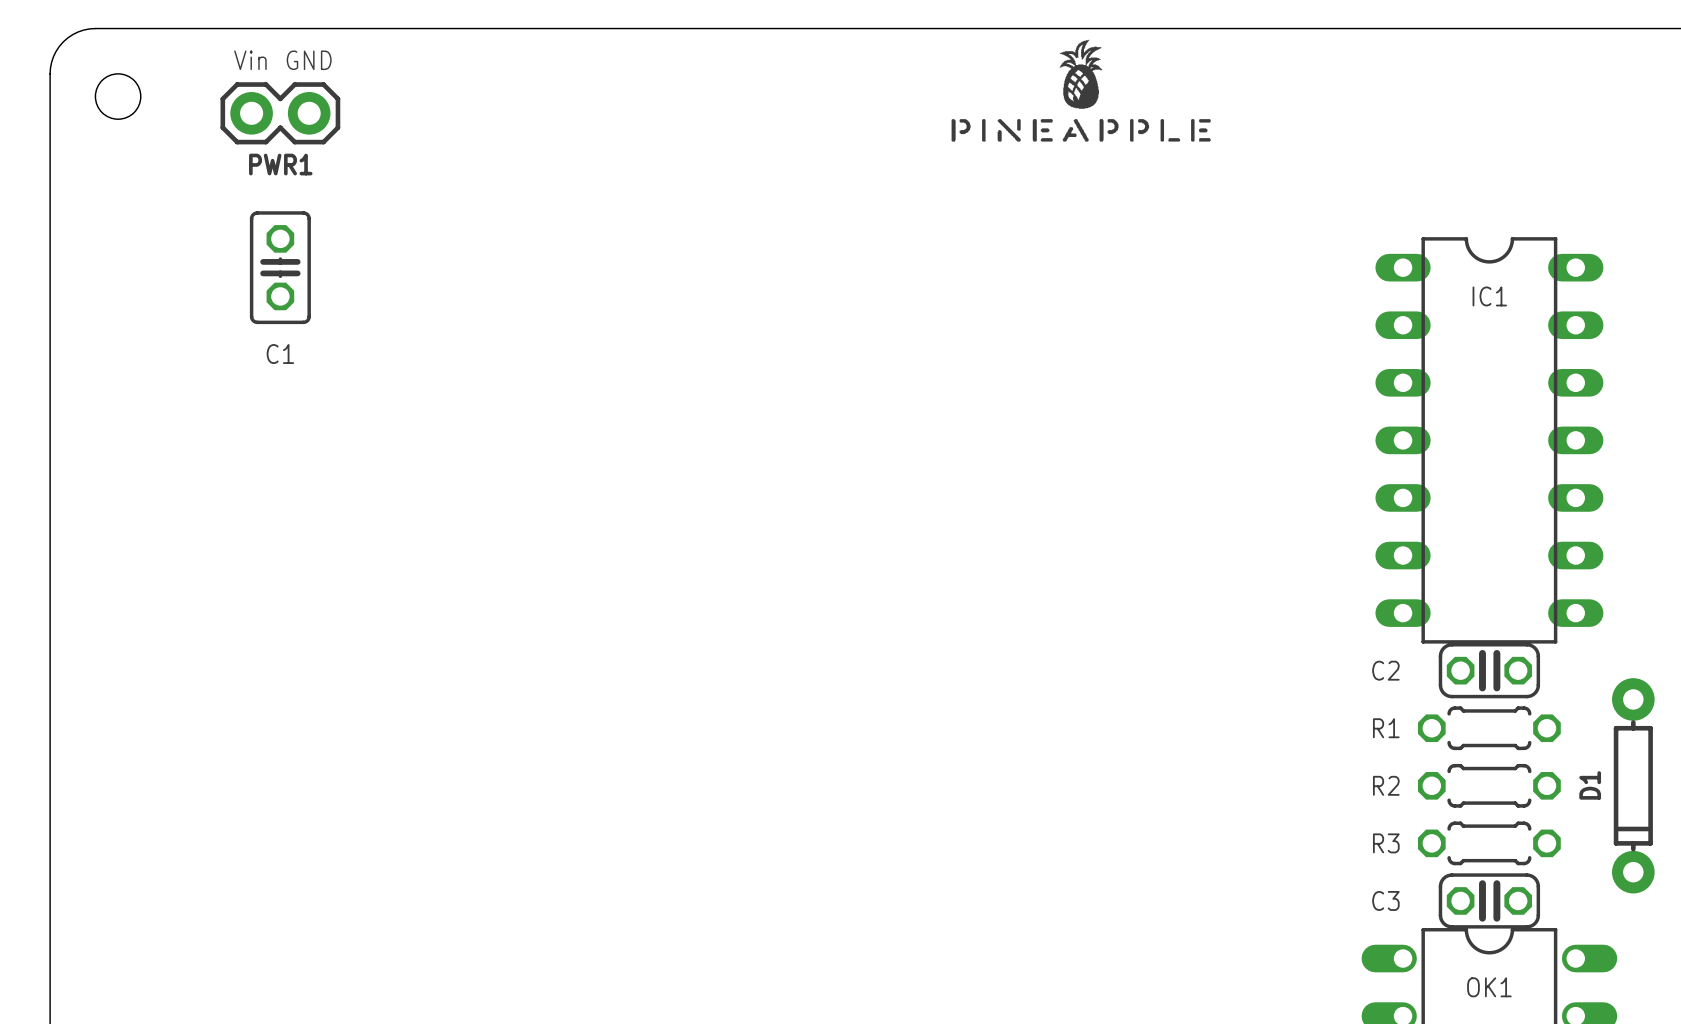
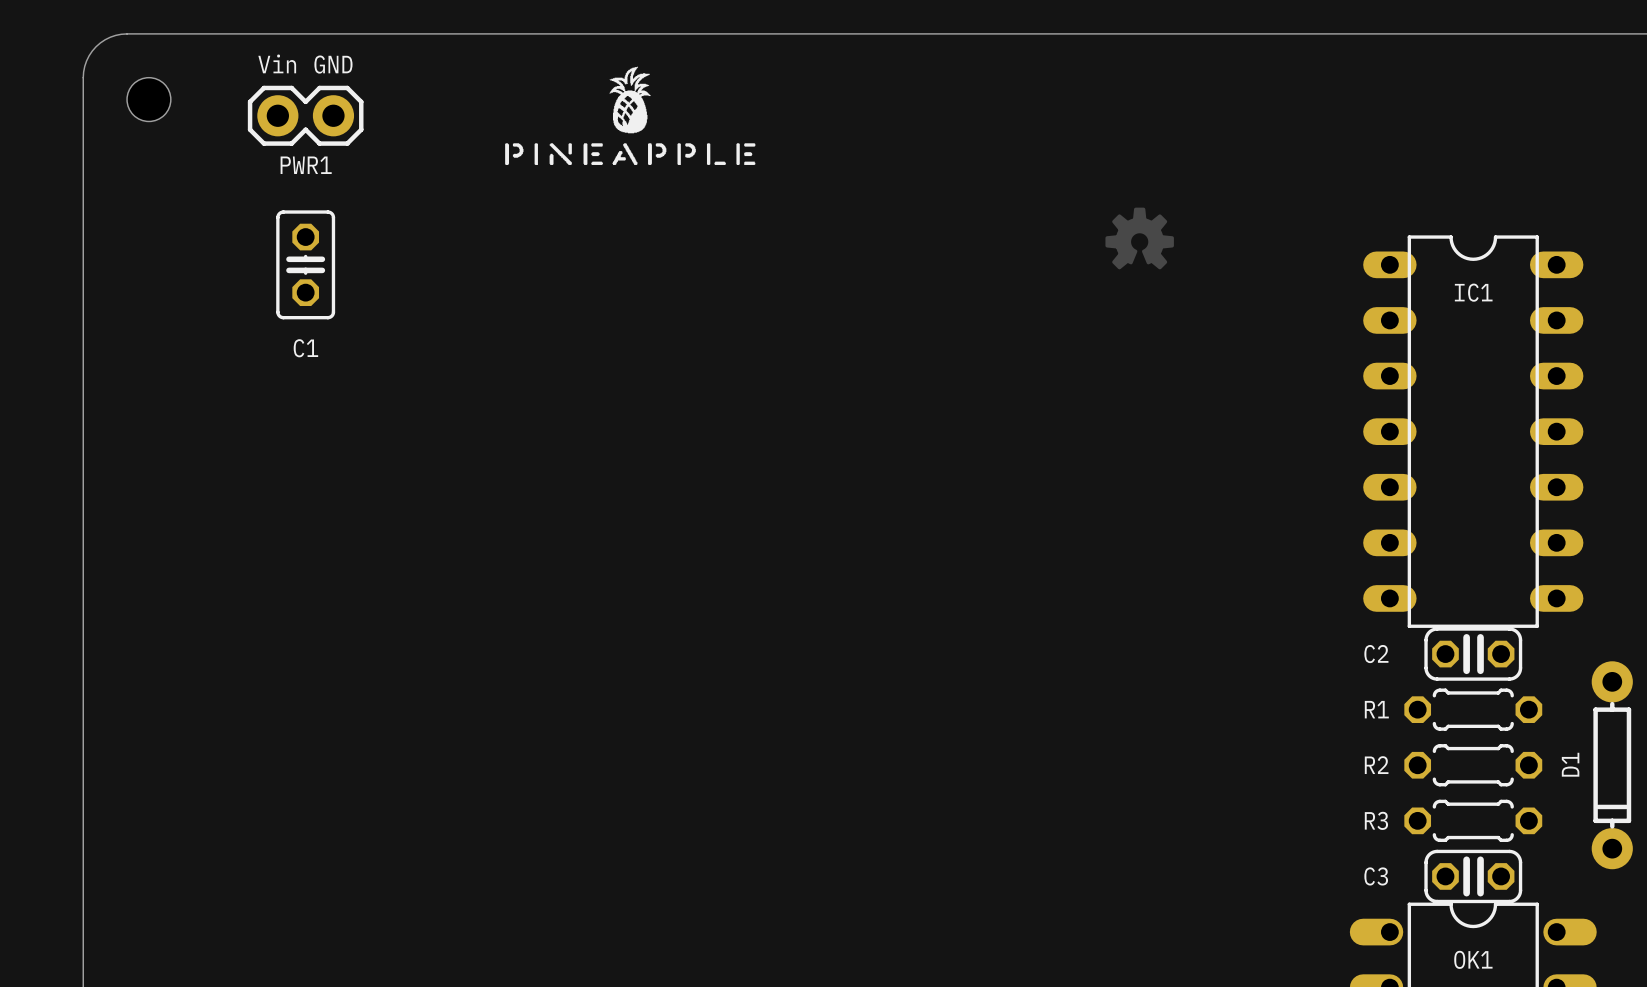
drawing position: (1081, 90) -> (630, 115)
drawing: none -> [1105, 207, 1174, 270]

